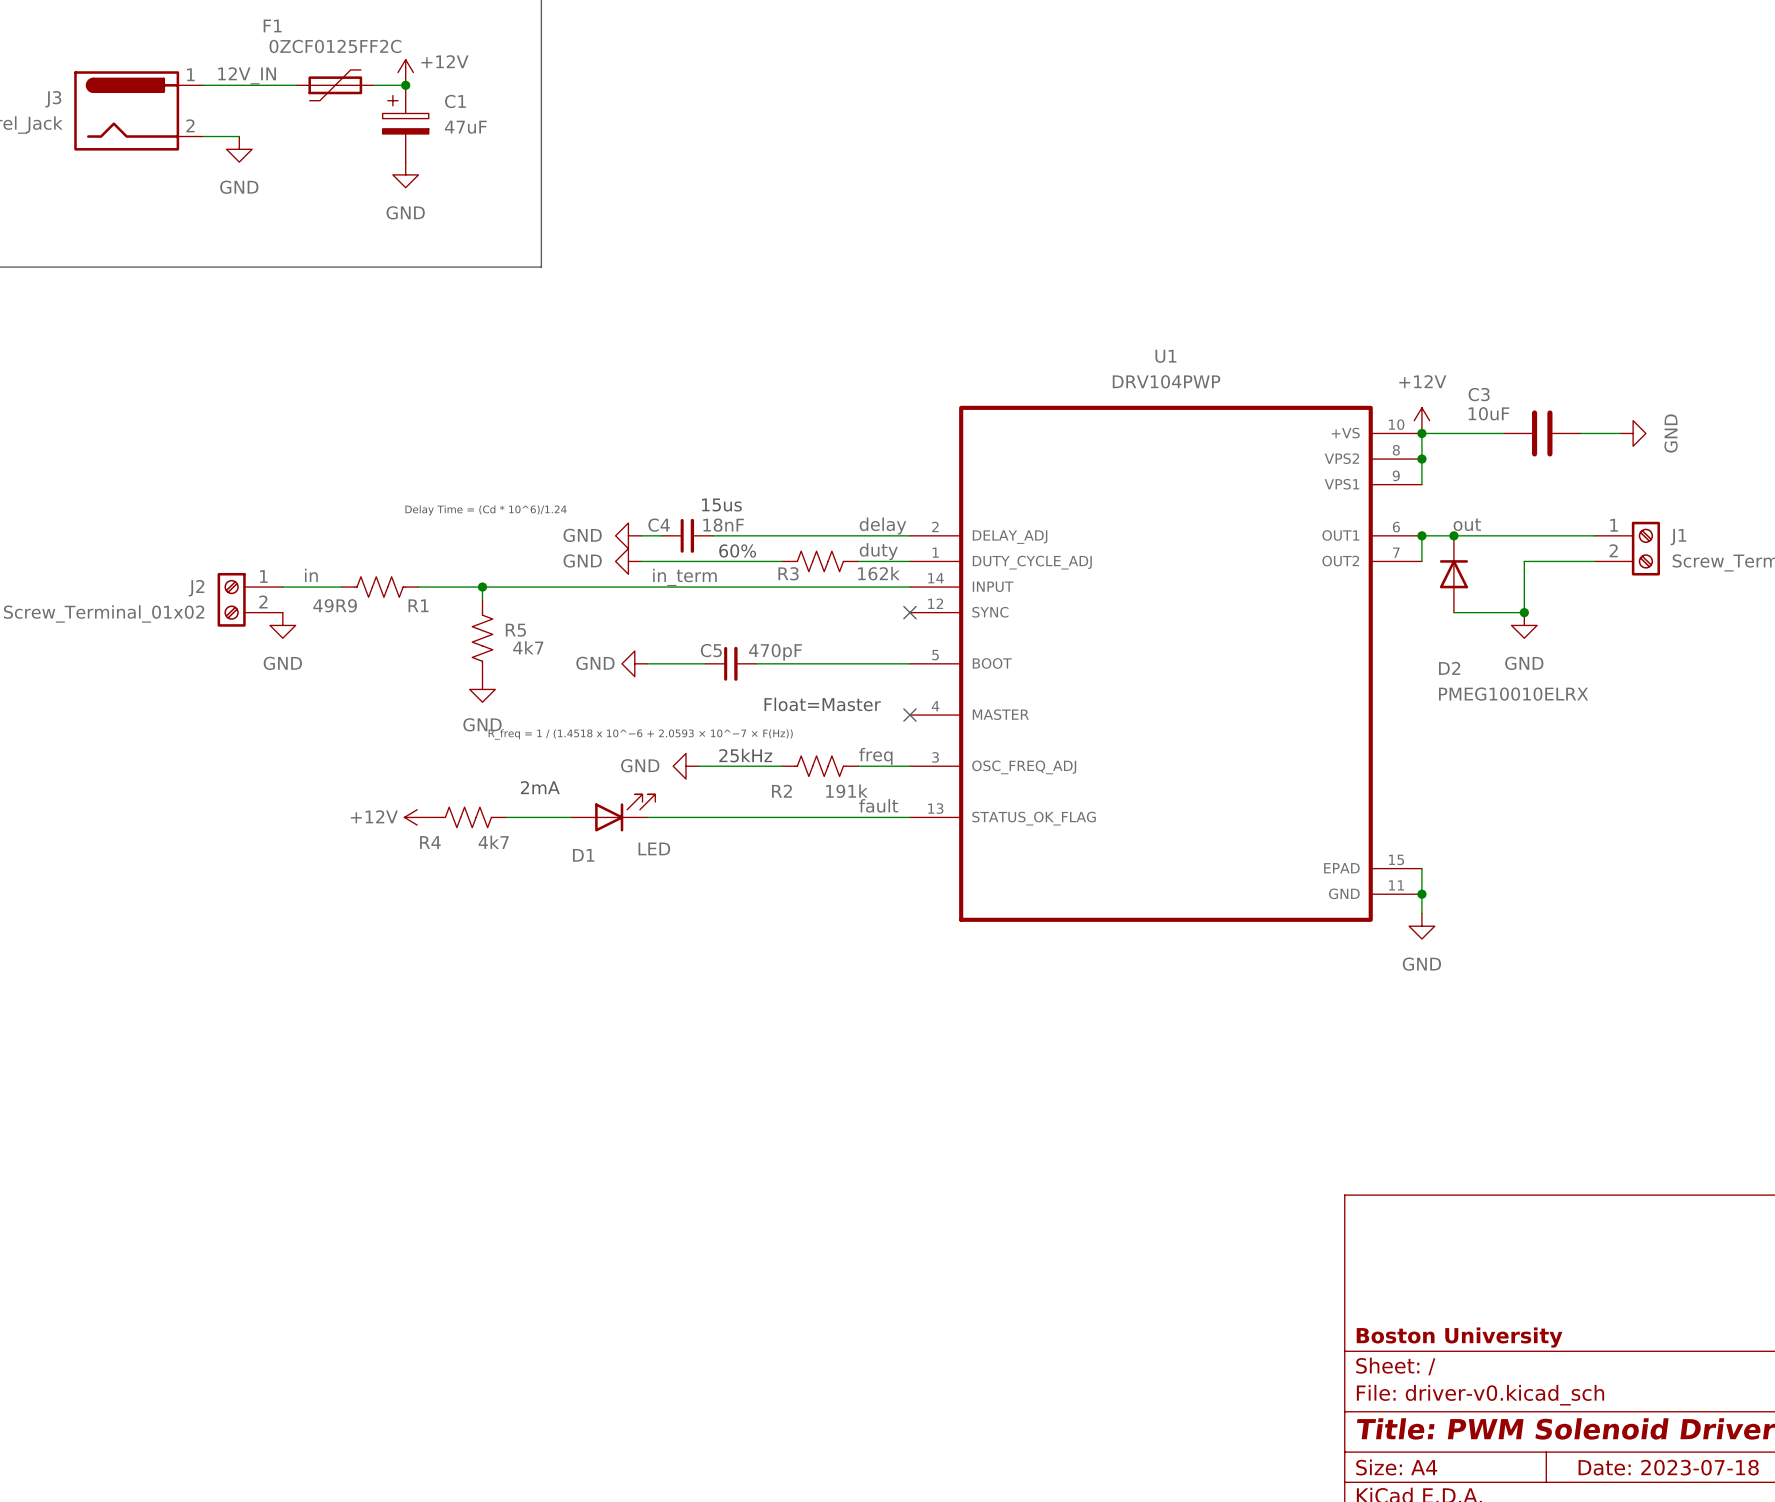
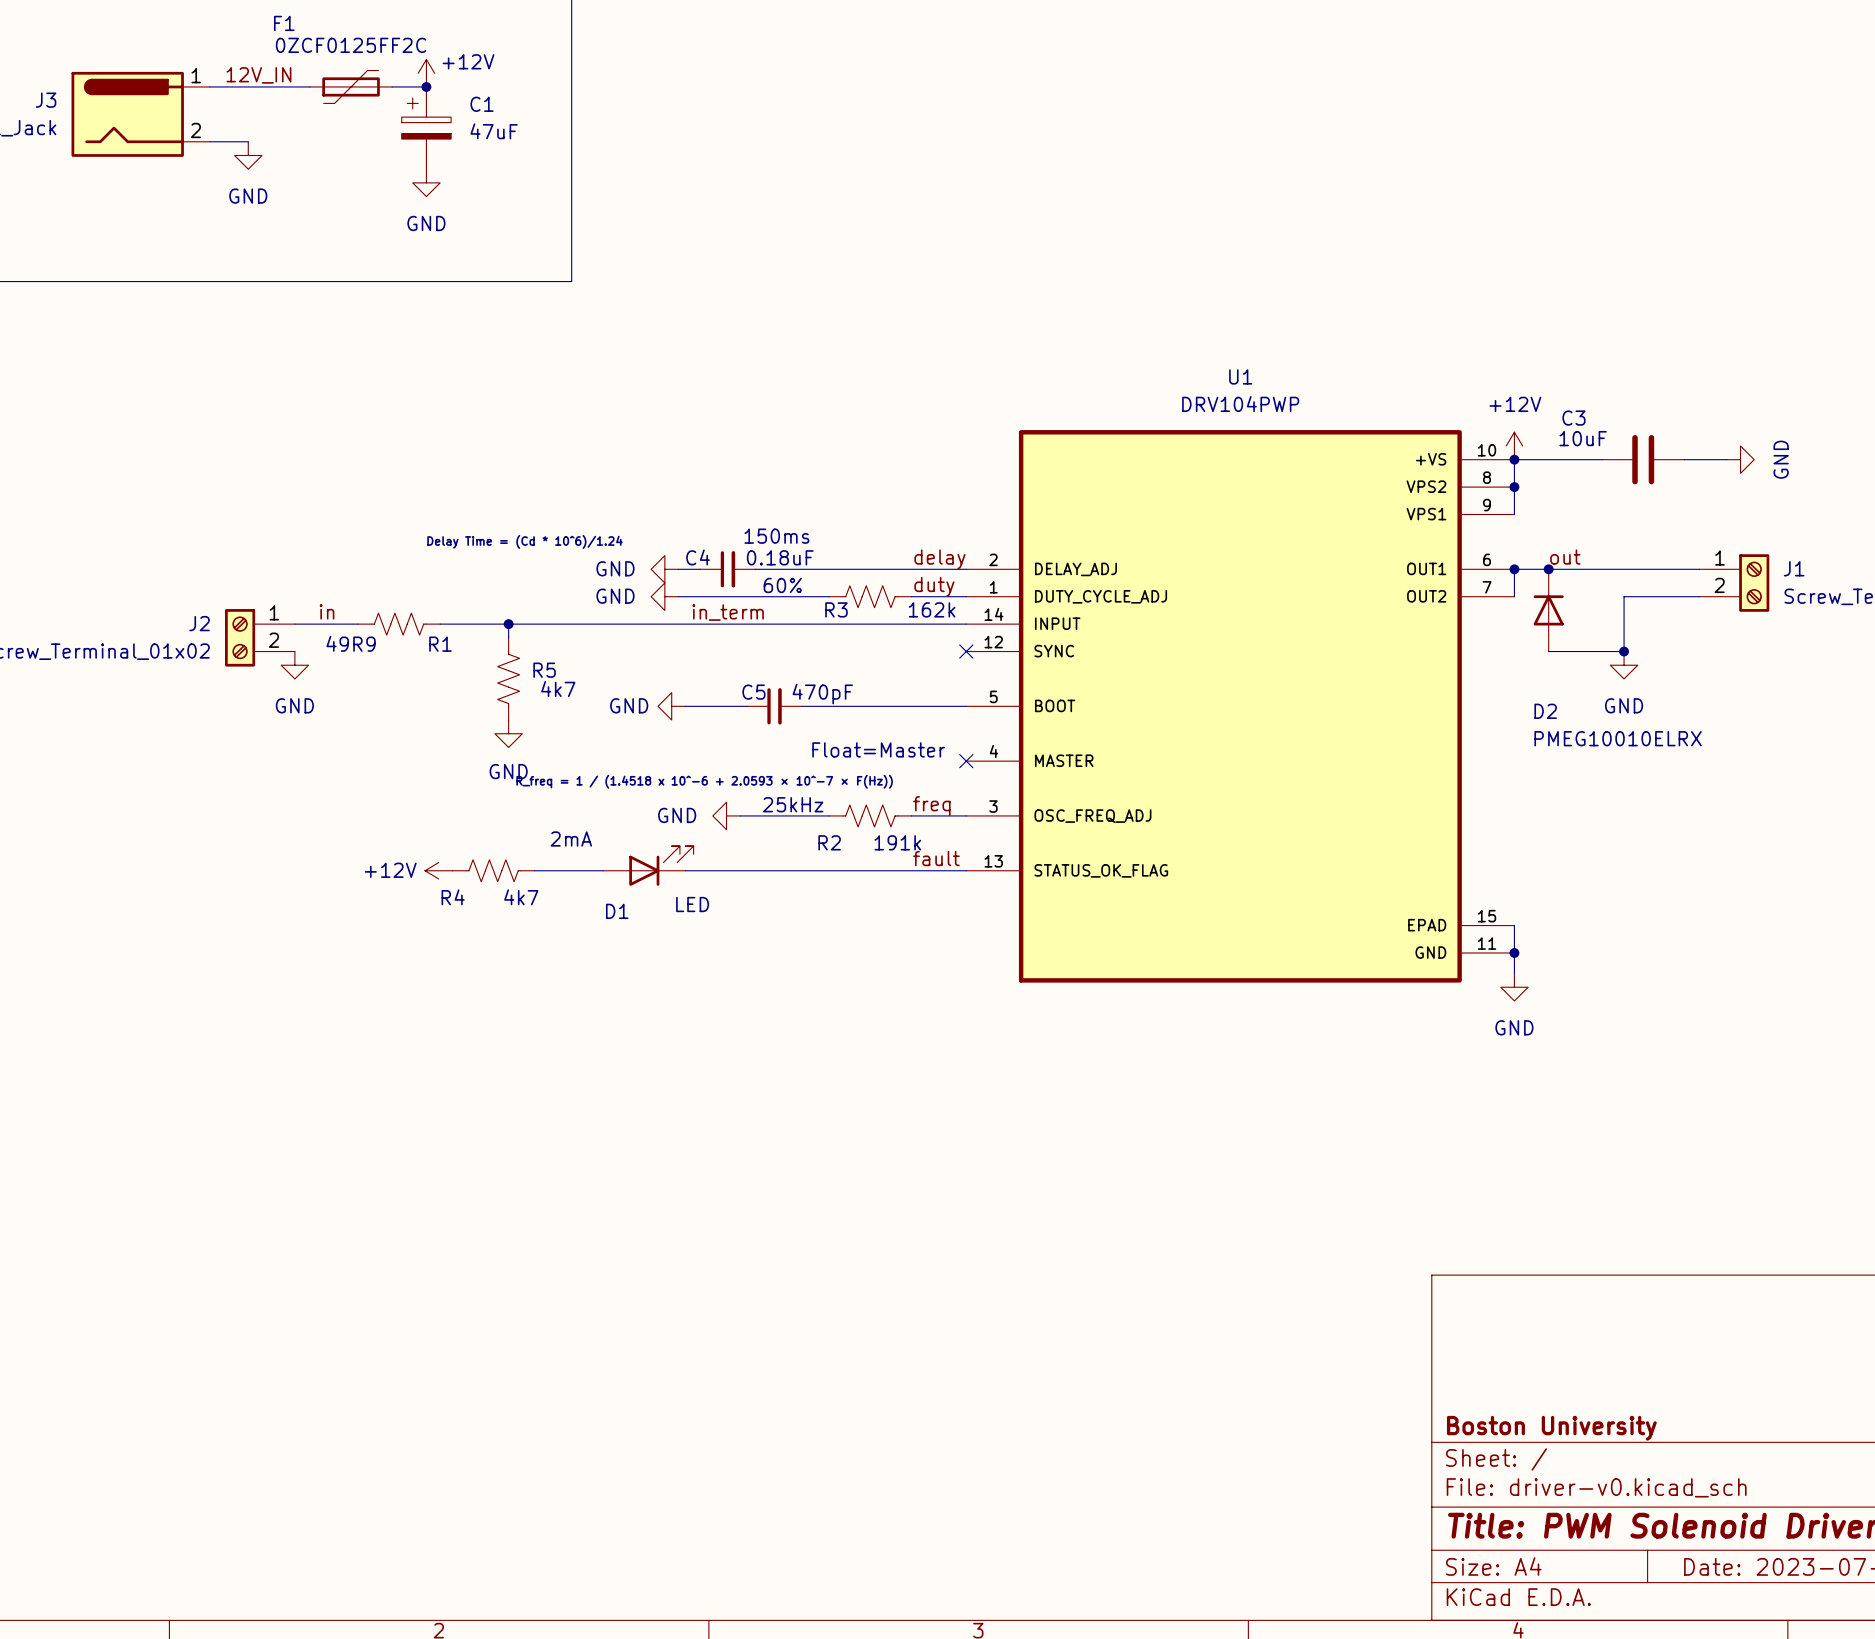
text: 15us (721, 505) -> 150ms (776, 536)
C4 value: 18nF (723, 525) -> 0.18uF (780, 557)

